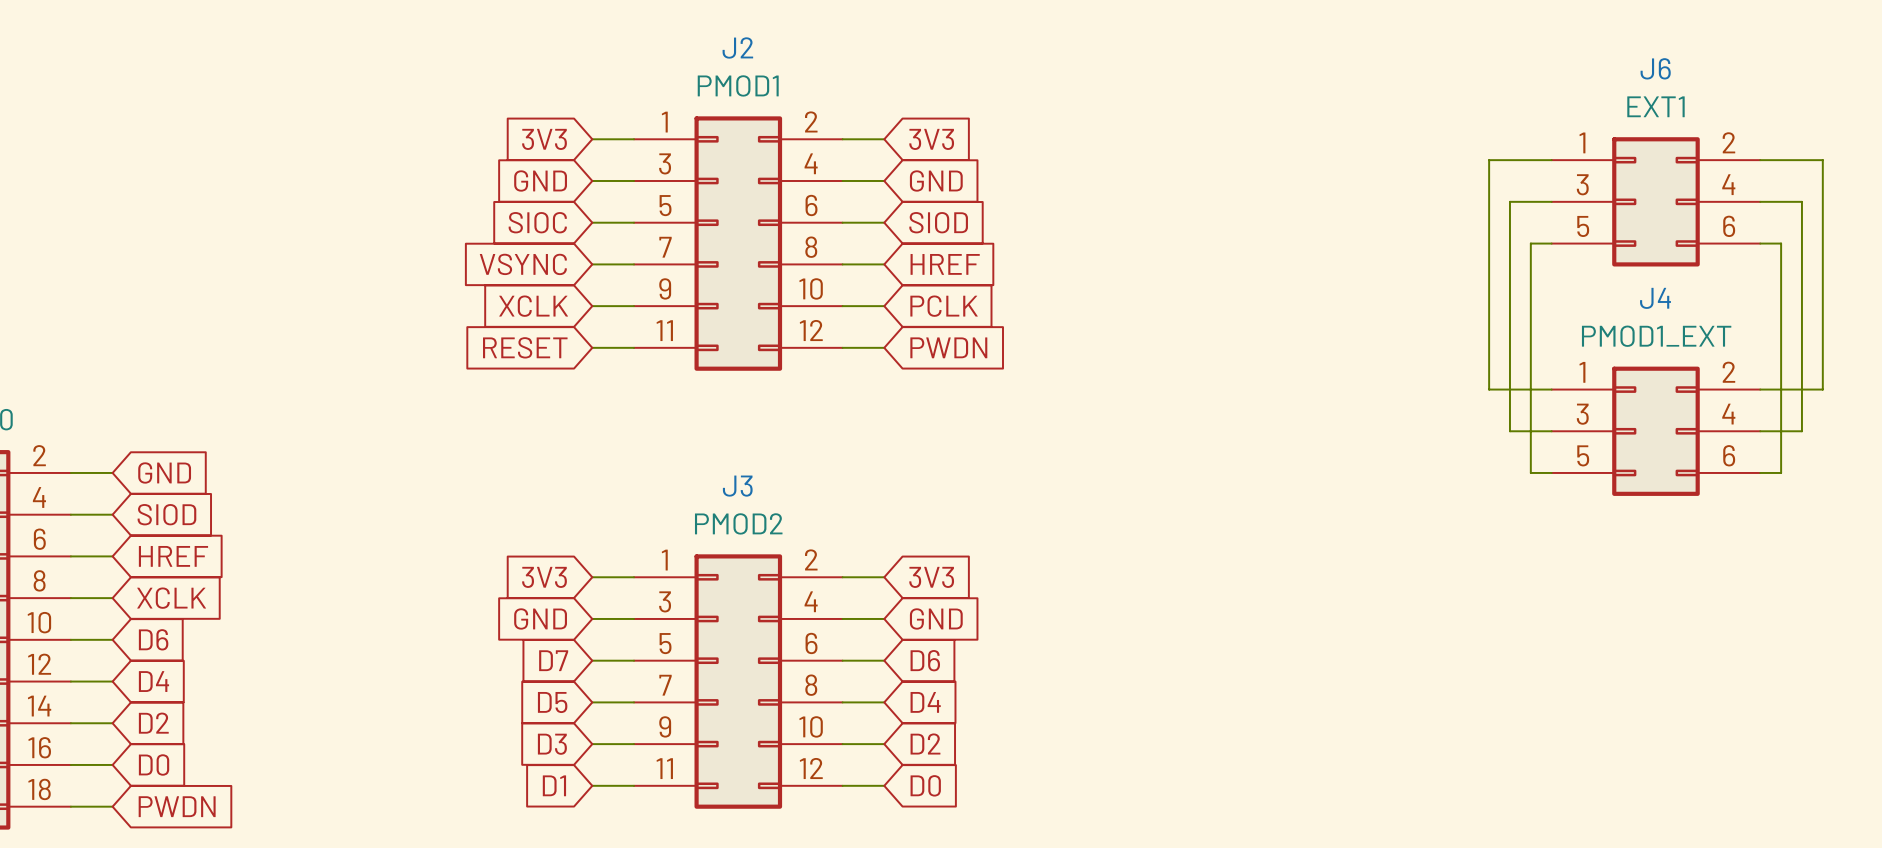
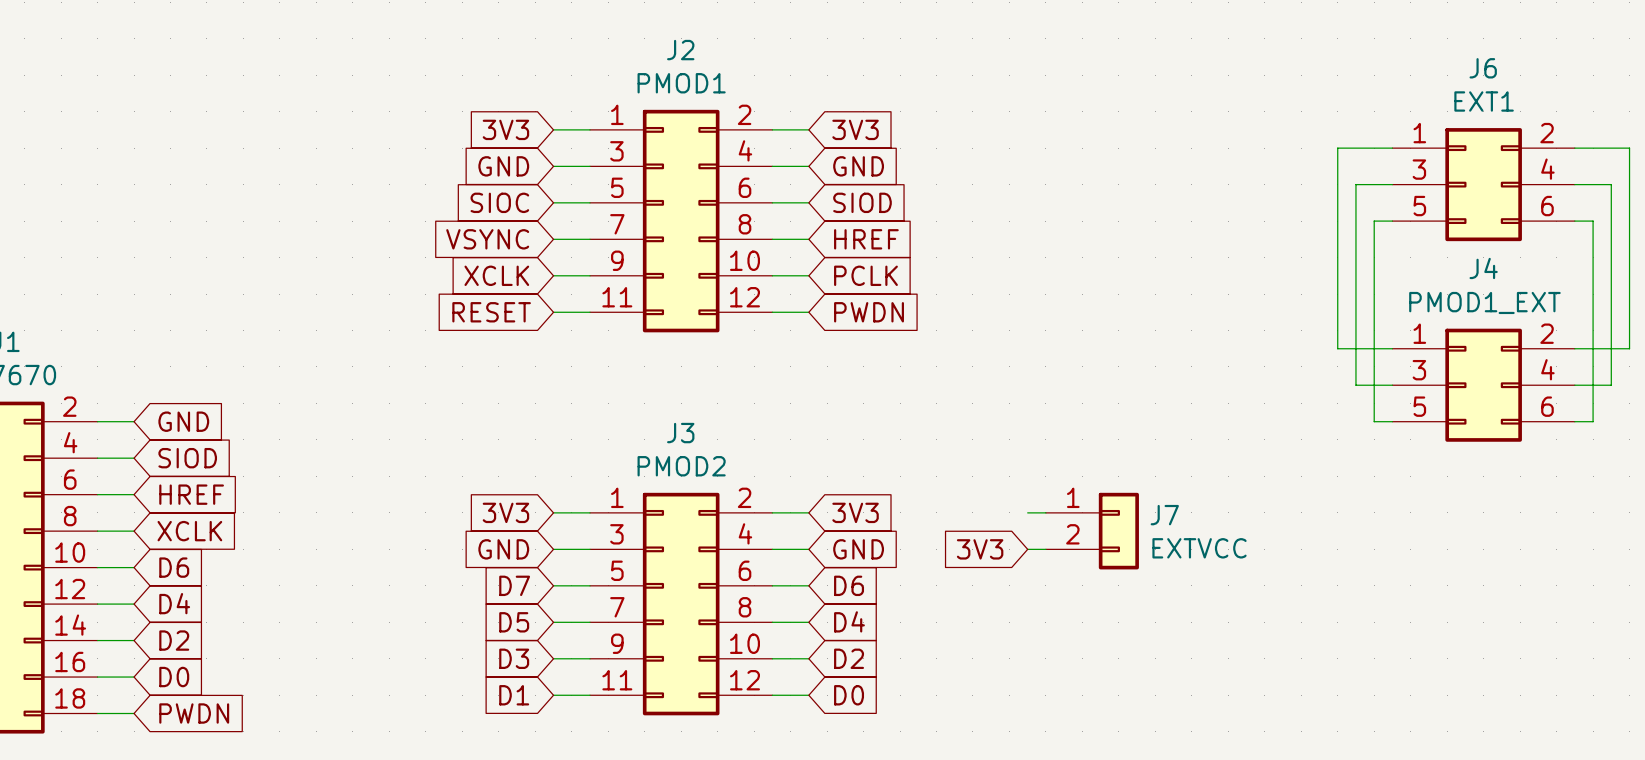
wire: none -> (1027, 512) (1045, 512)
J7: none -> EXTVCC (1092, 531)
wire: none -> (1027, 549) (1045, 549)
global label: none -> 3V3 (980, 549)

